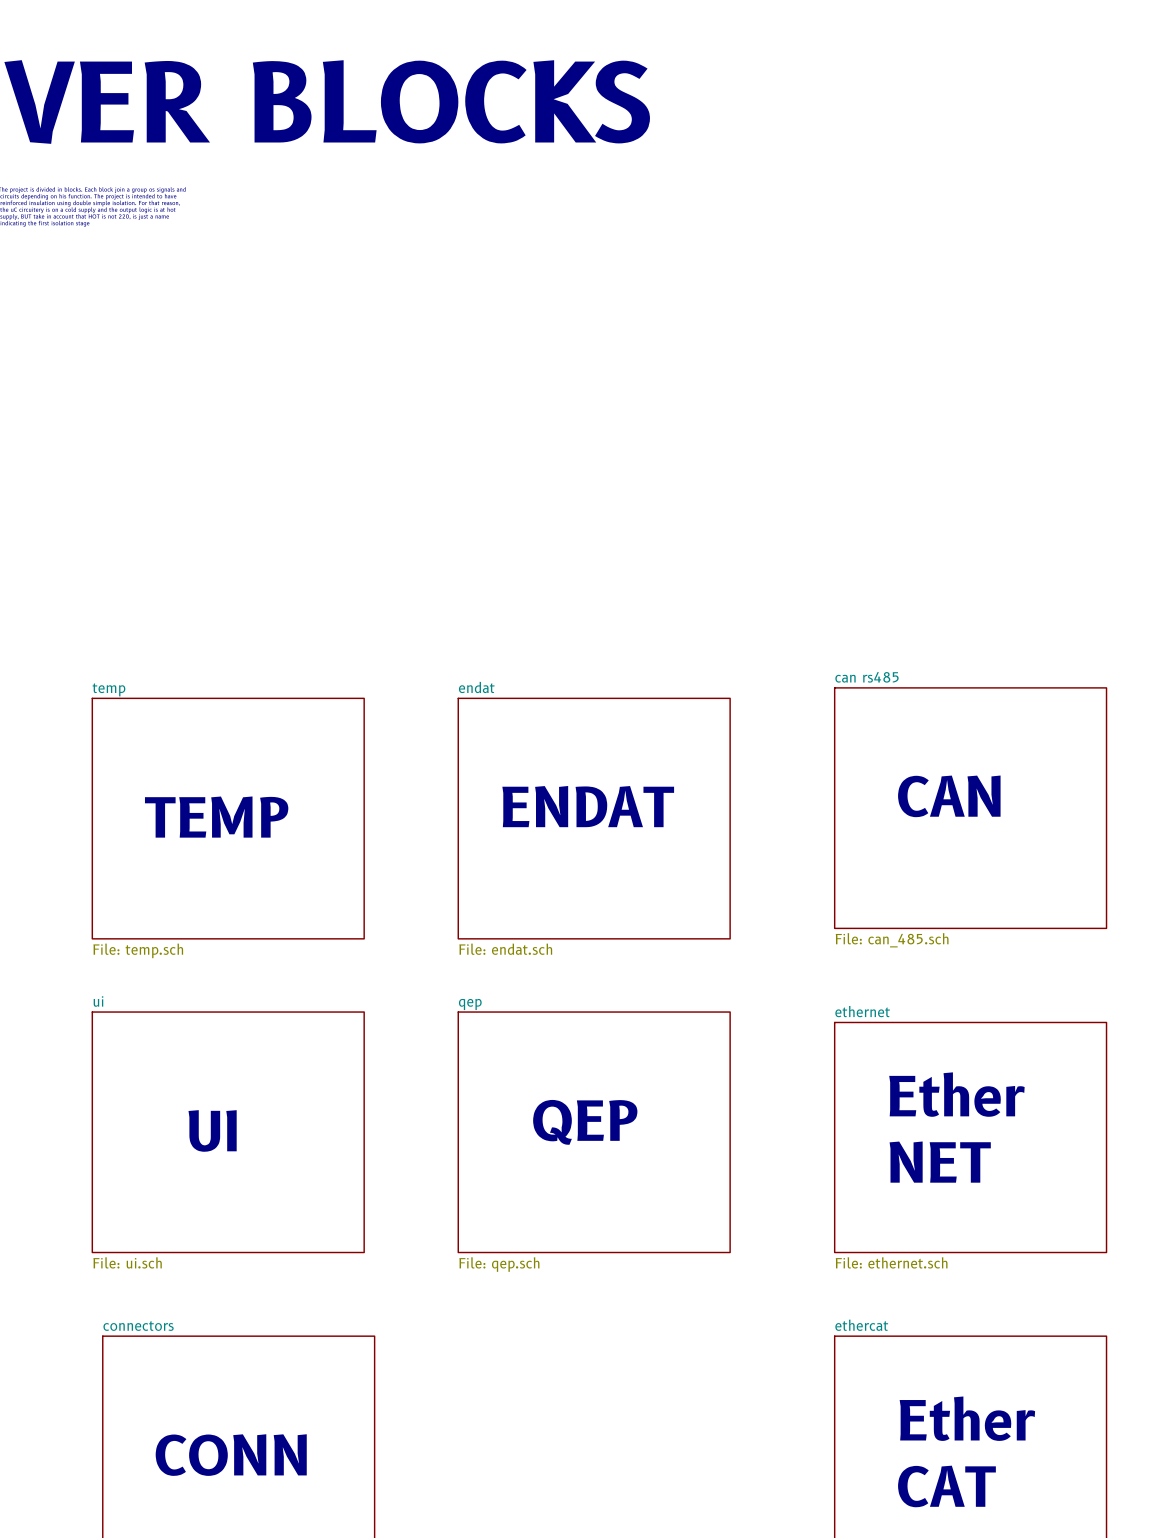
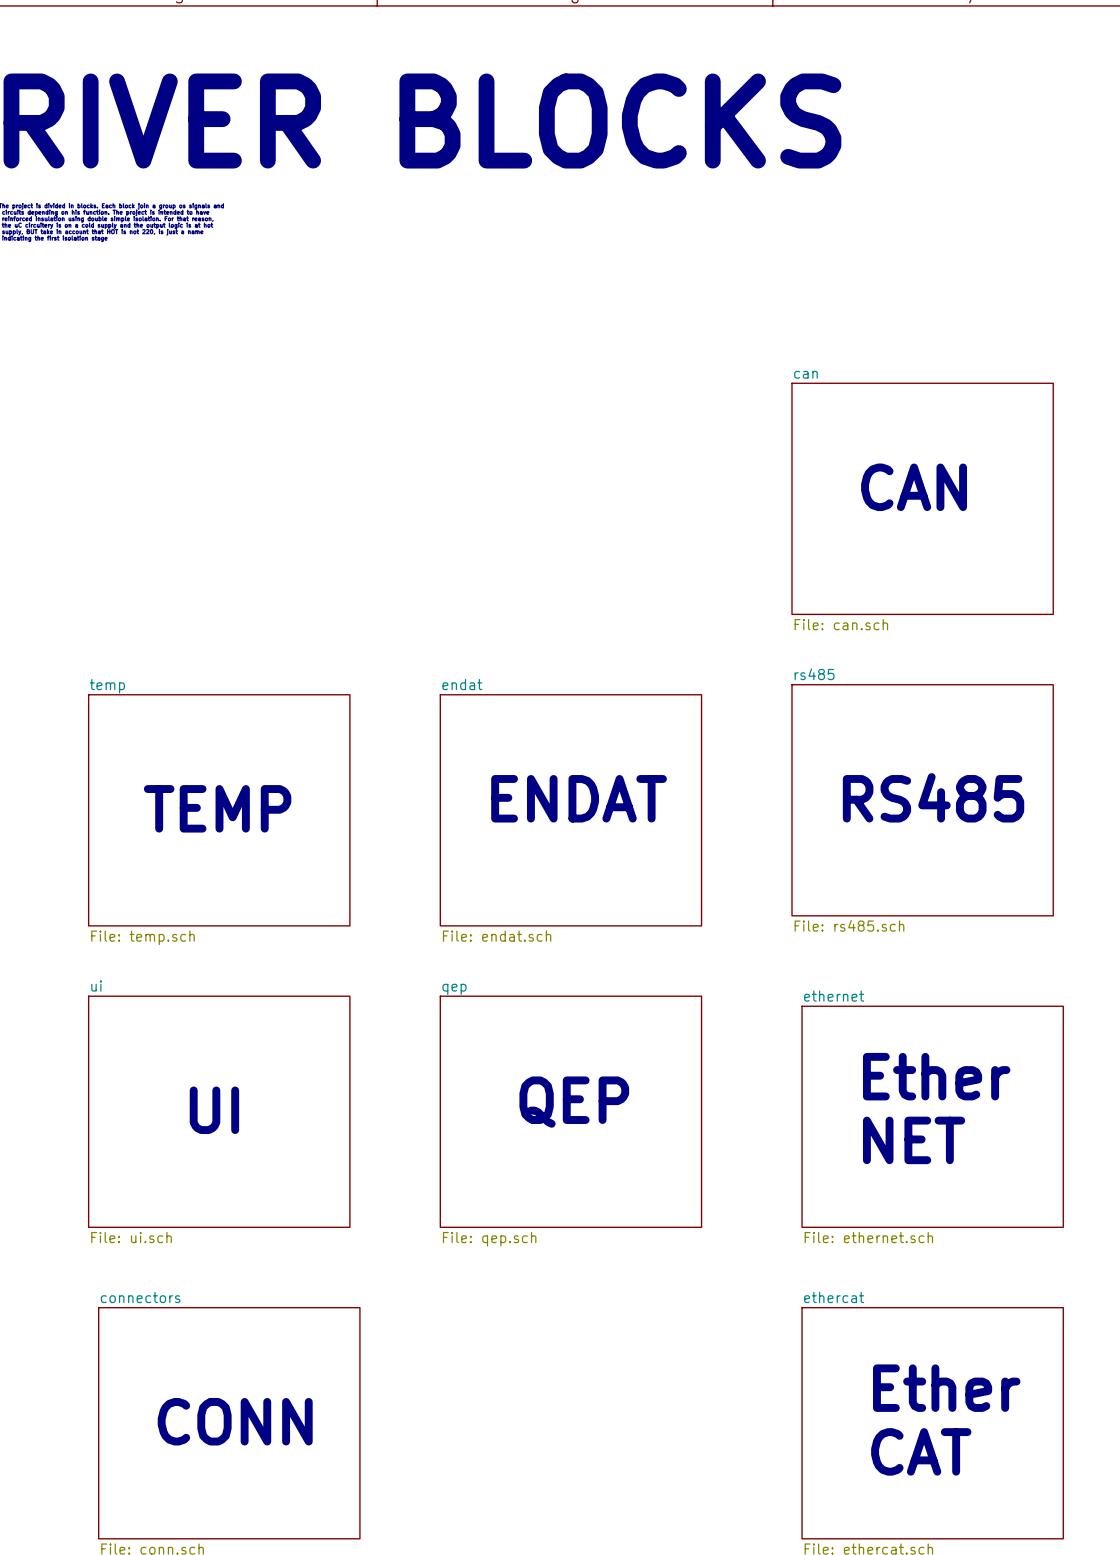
text: none -> CAN (914, 487)
sheet can: none -> File: can.sch (922, 498)
text: CAN (949, 796) -> none
text: none -> RS485 (933, 797)
sheet rs485: none -> File: rs485.sch (922, 800)
sheet can rs485: File: can_485.sch (970, 808) -> none

